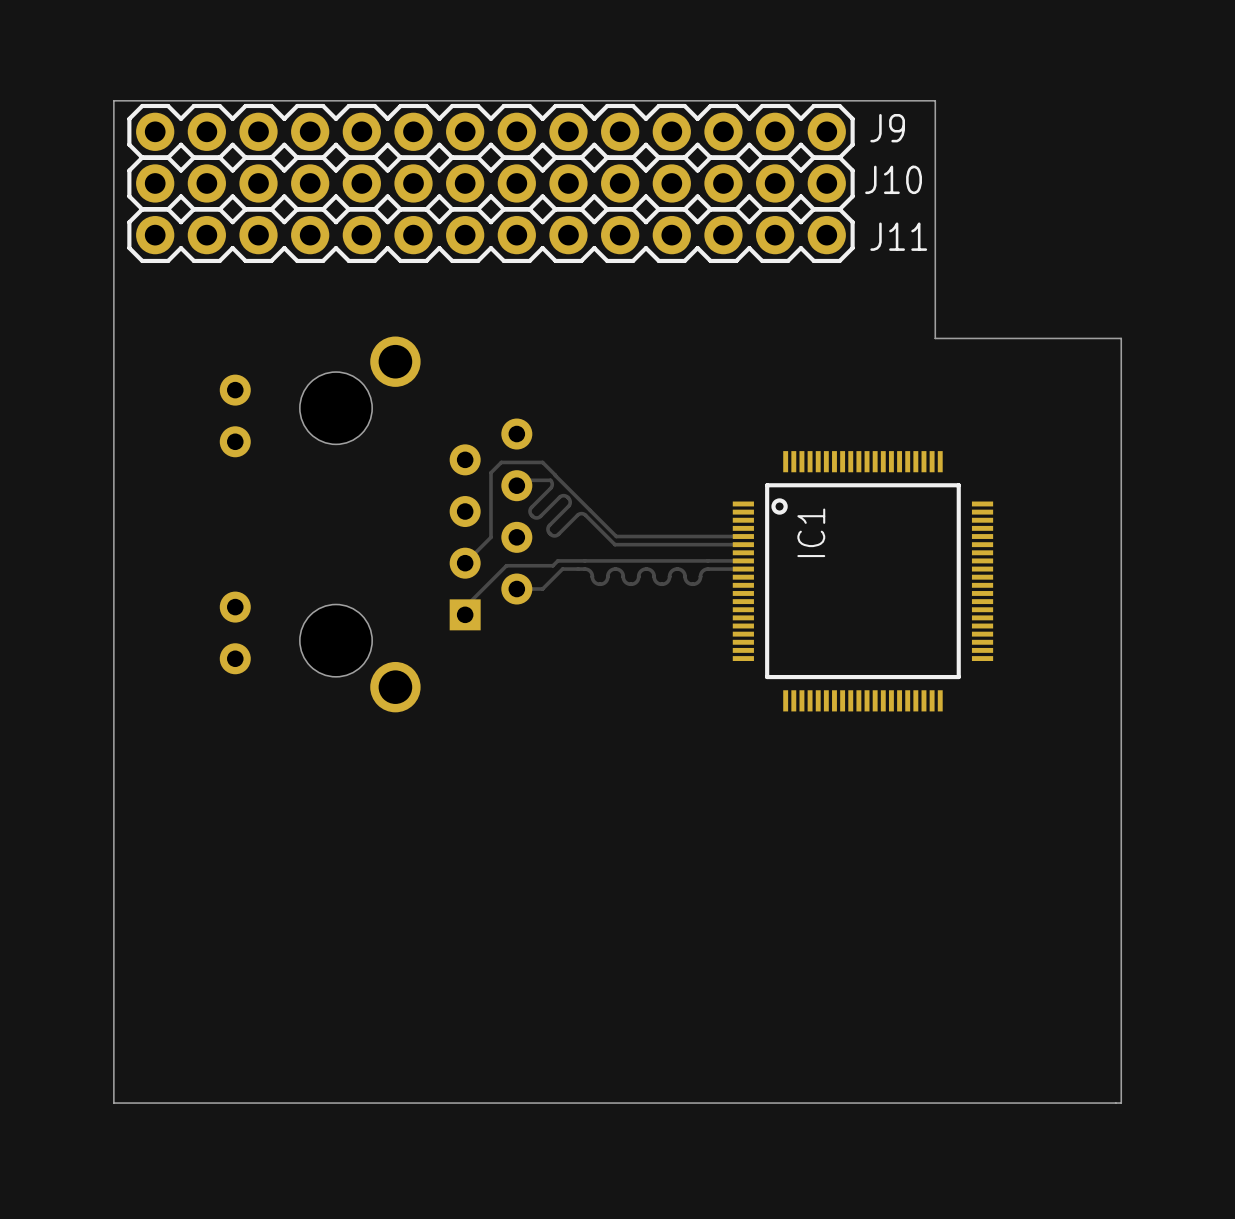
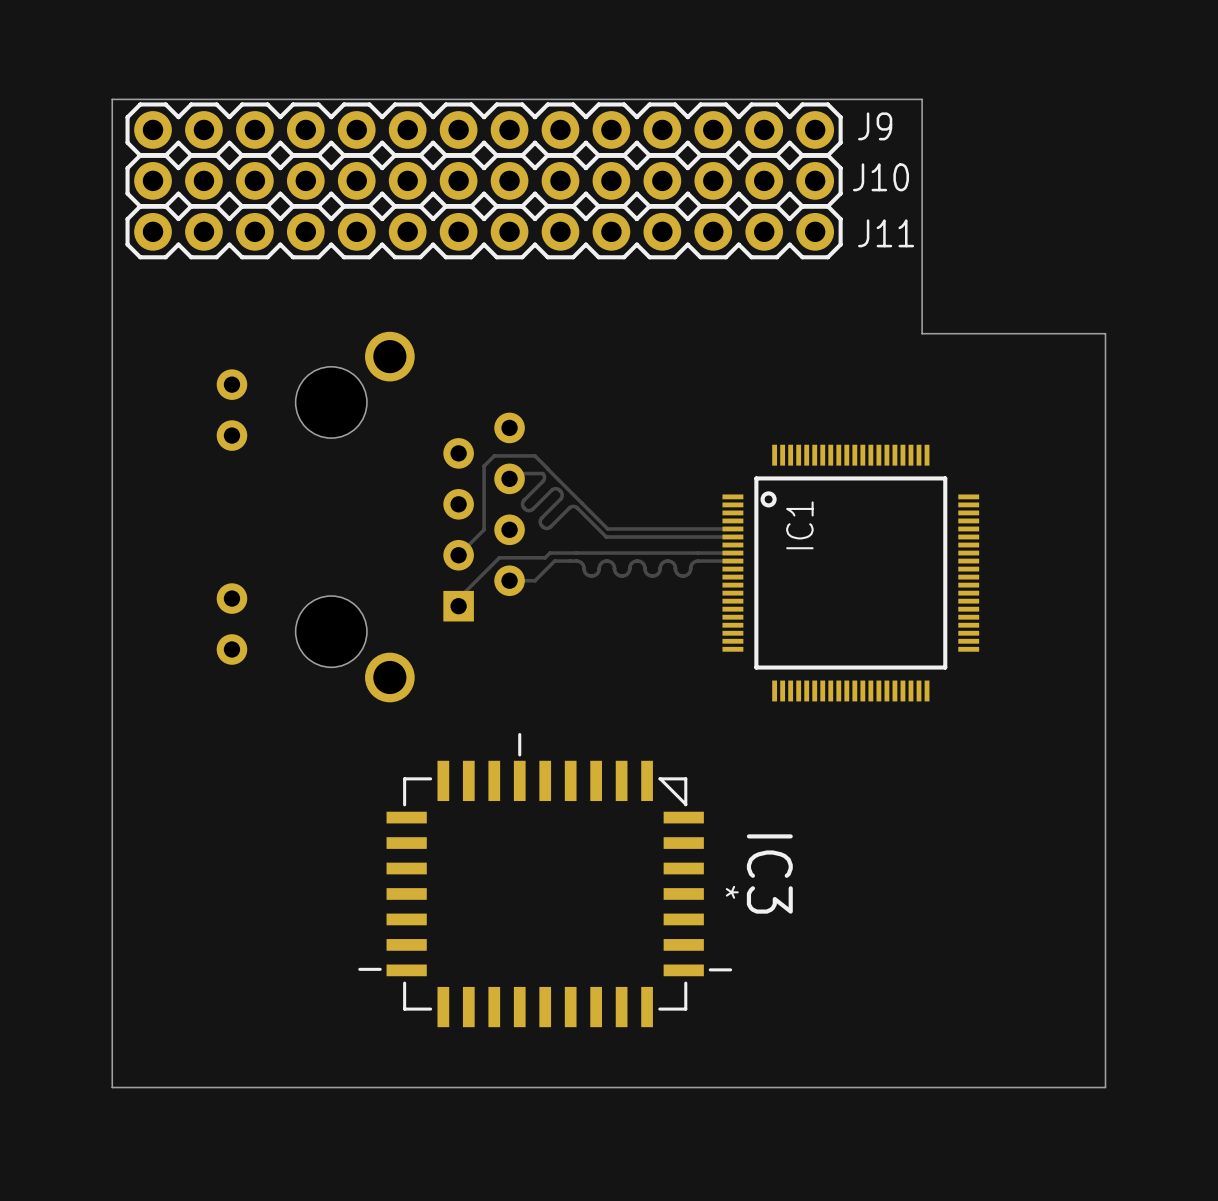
IC3: none -> (545, 880)

